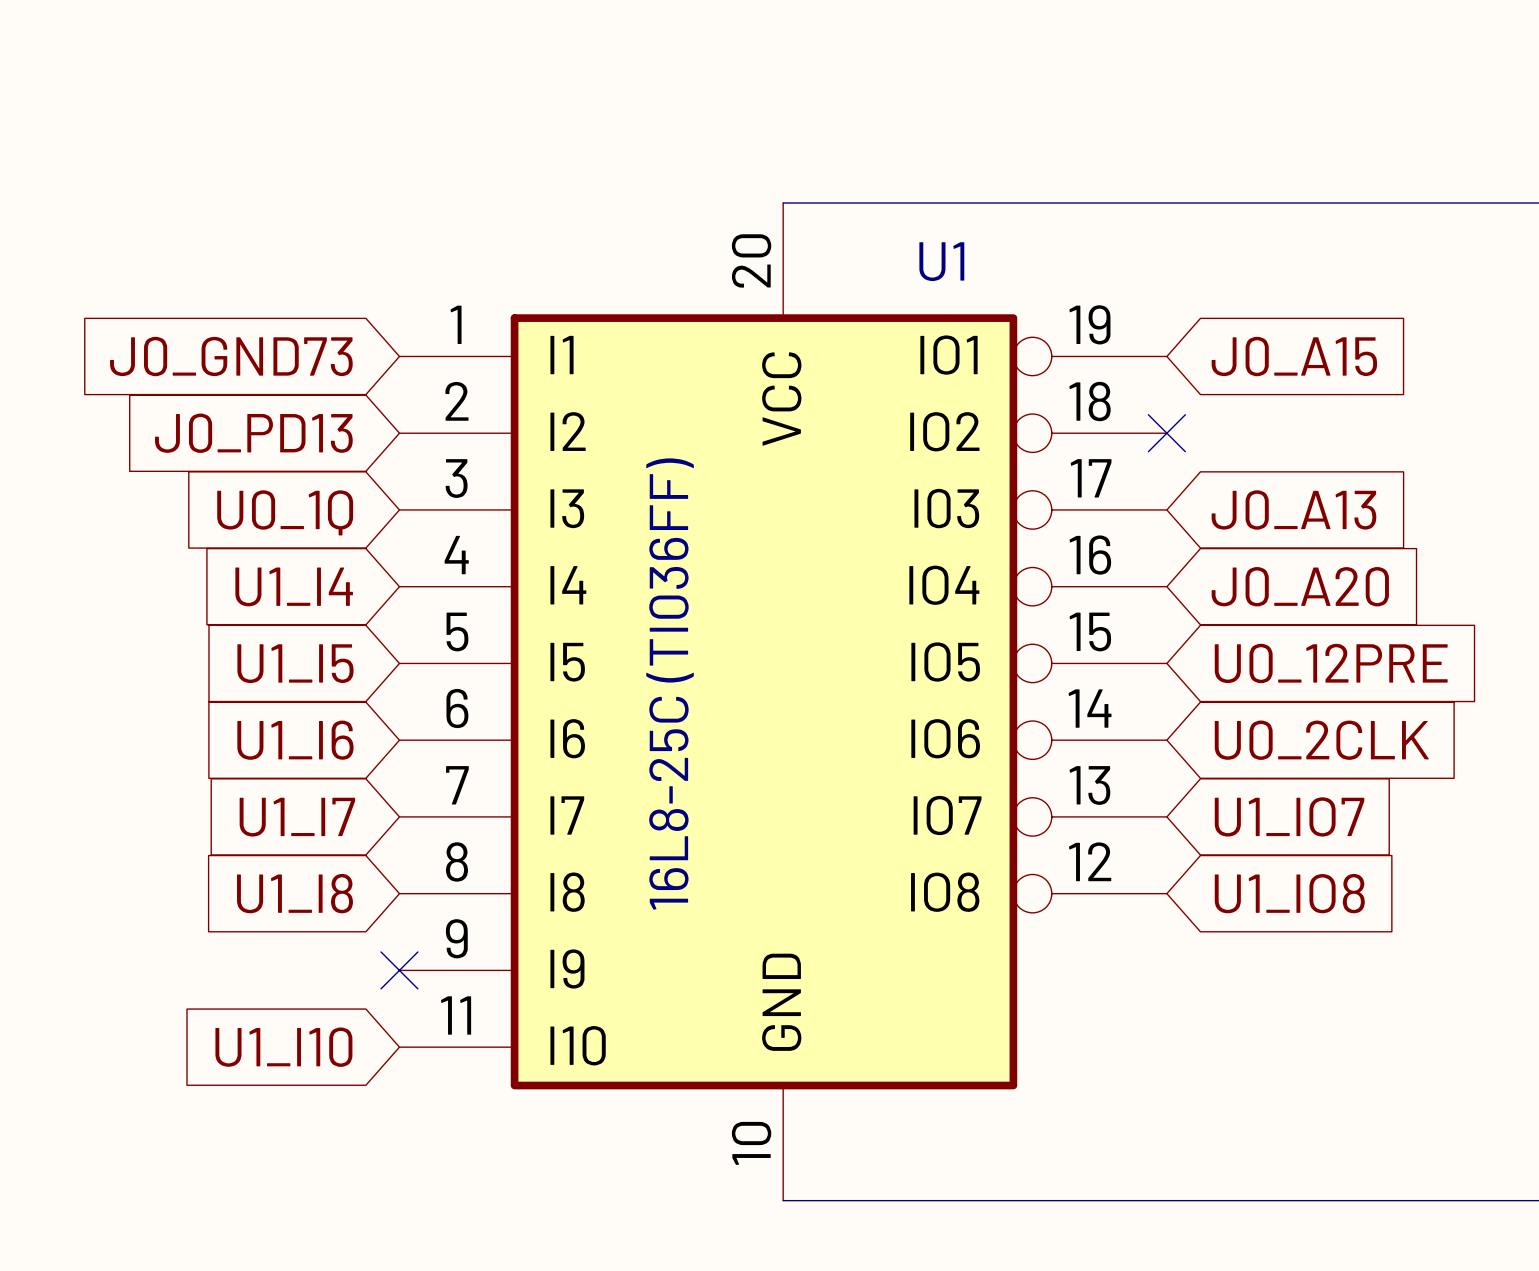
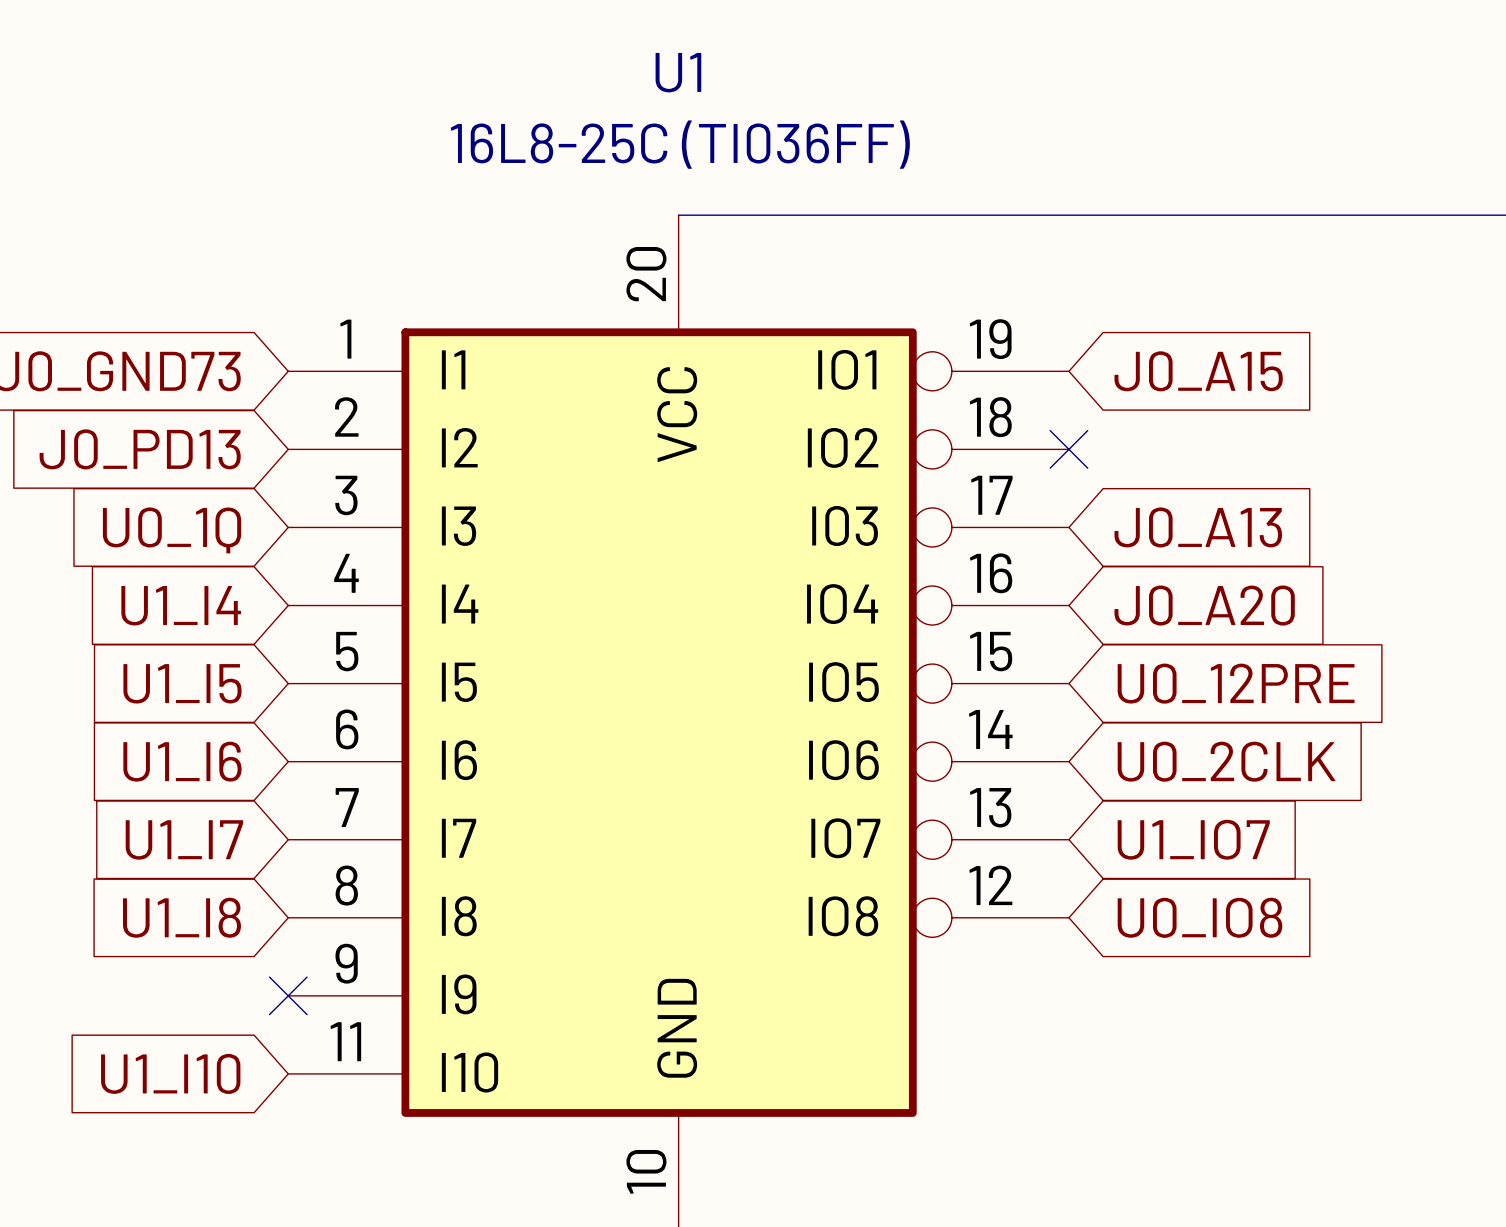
U1 name position: U1 (941, 261) -> U1 (678, 72)
U1 value rotation: 0° (670, 684) -> 90° clockwise (680, 144)
global label: U1_IO8 (1289, 893) -> U0_IO8 (1199, 917)

